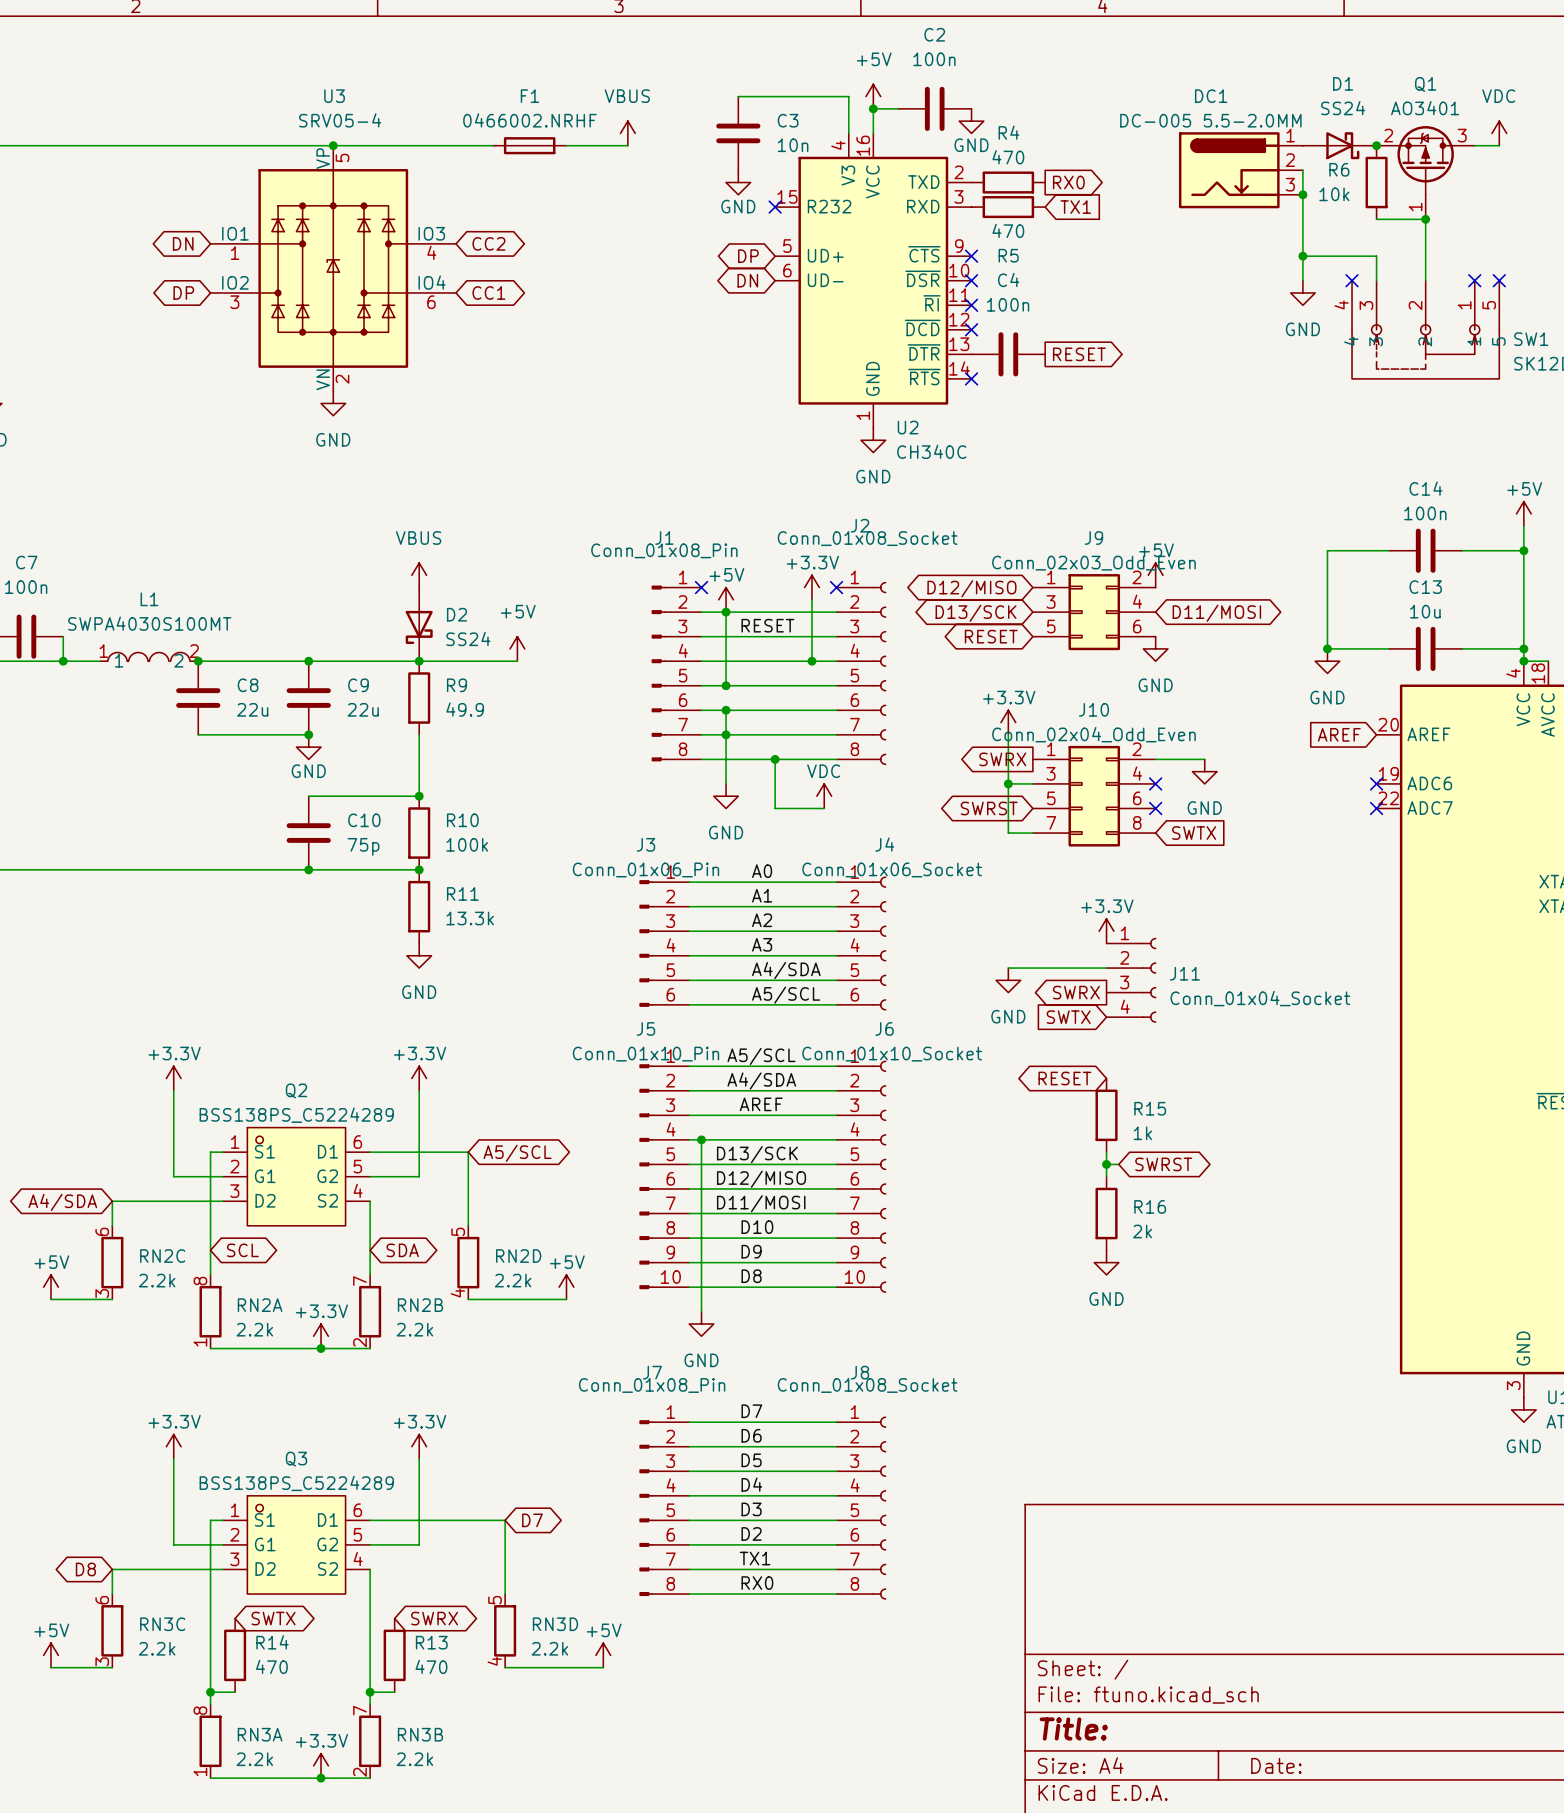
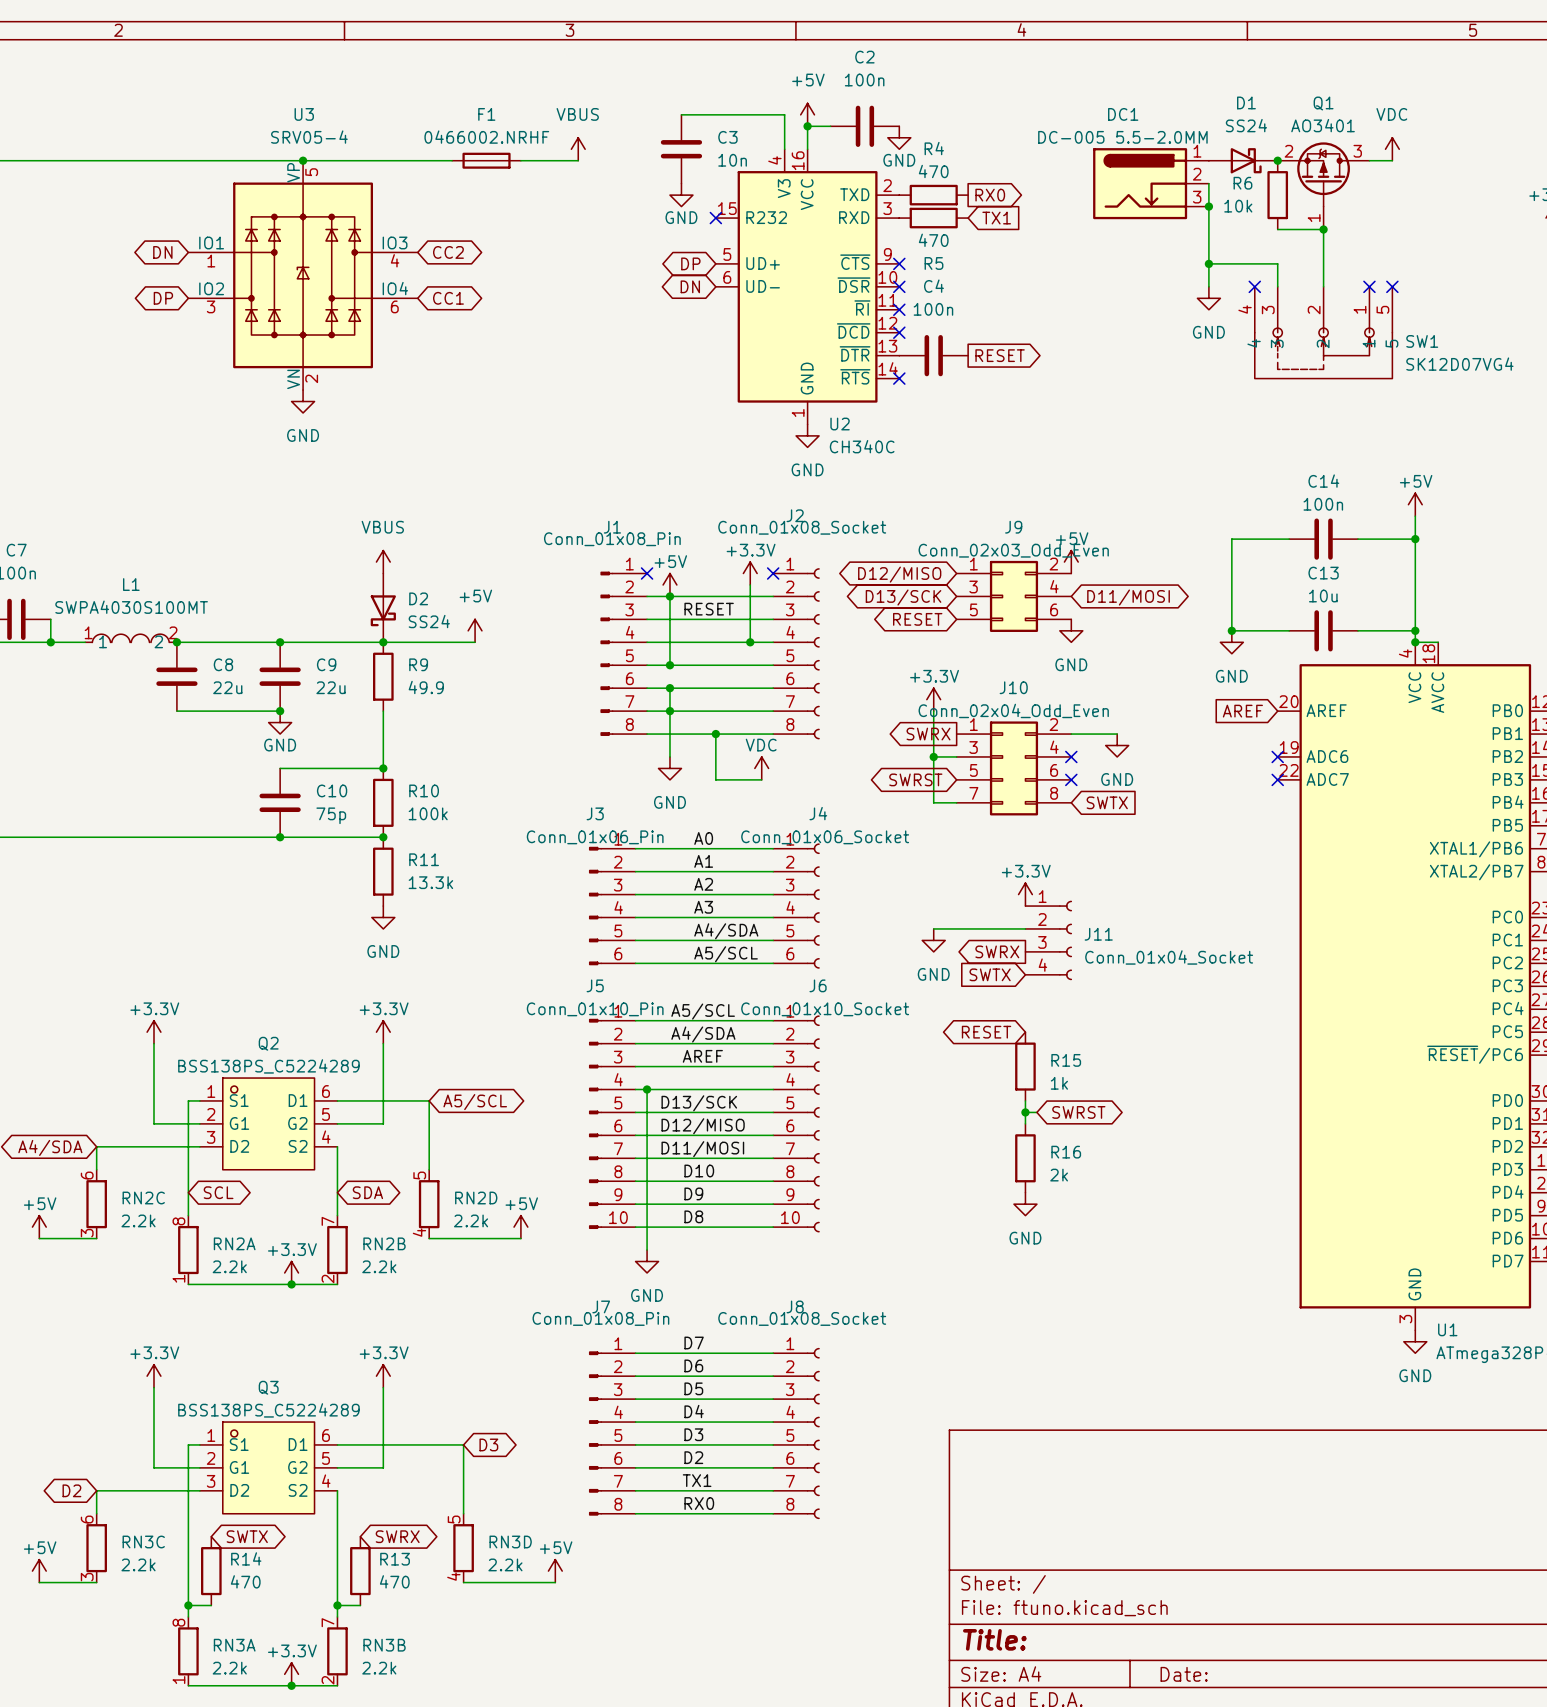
global label: D7 (532, 1520) -> D3 (488, 1444)
global label: D8 (85, 1569) -> D2 (71, 1490)

